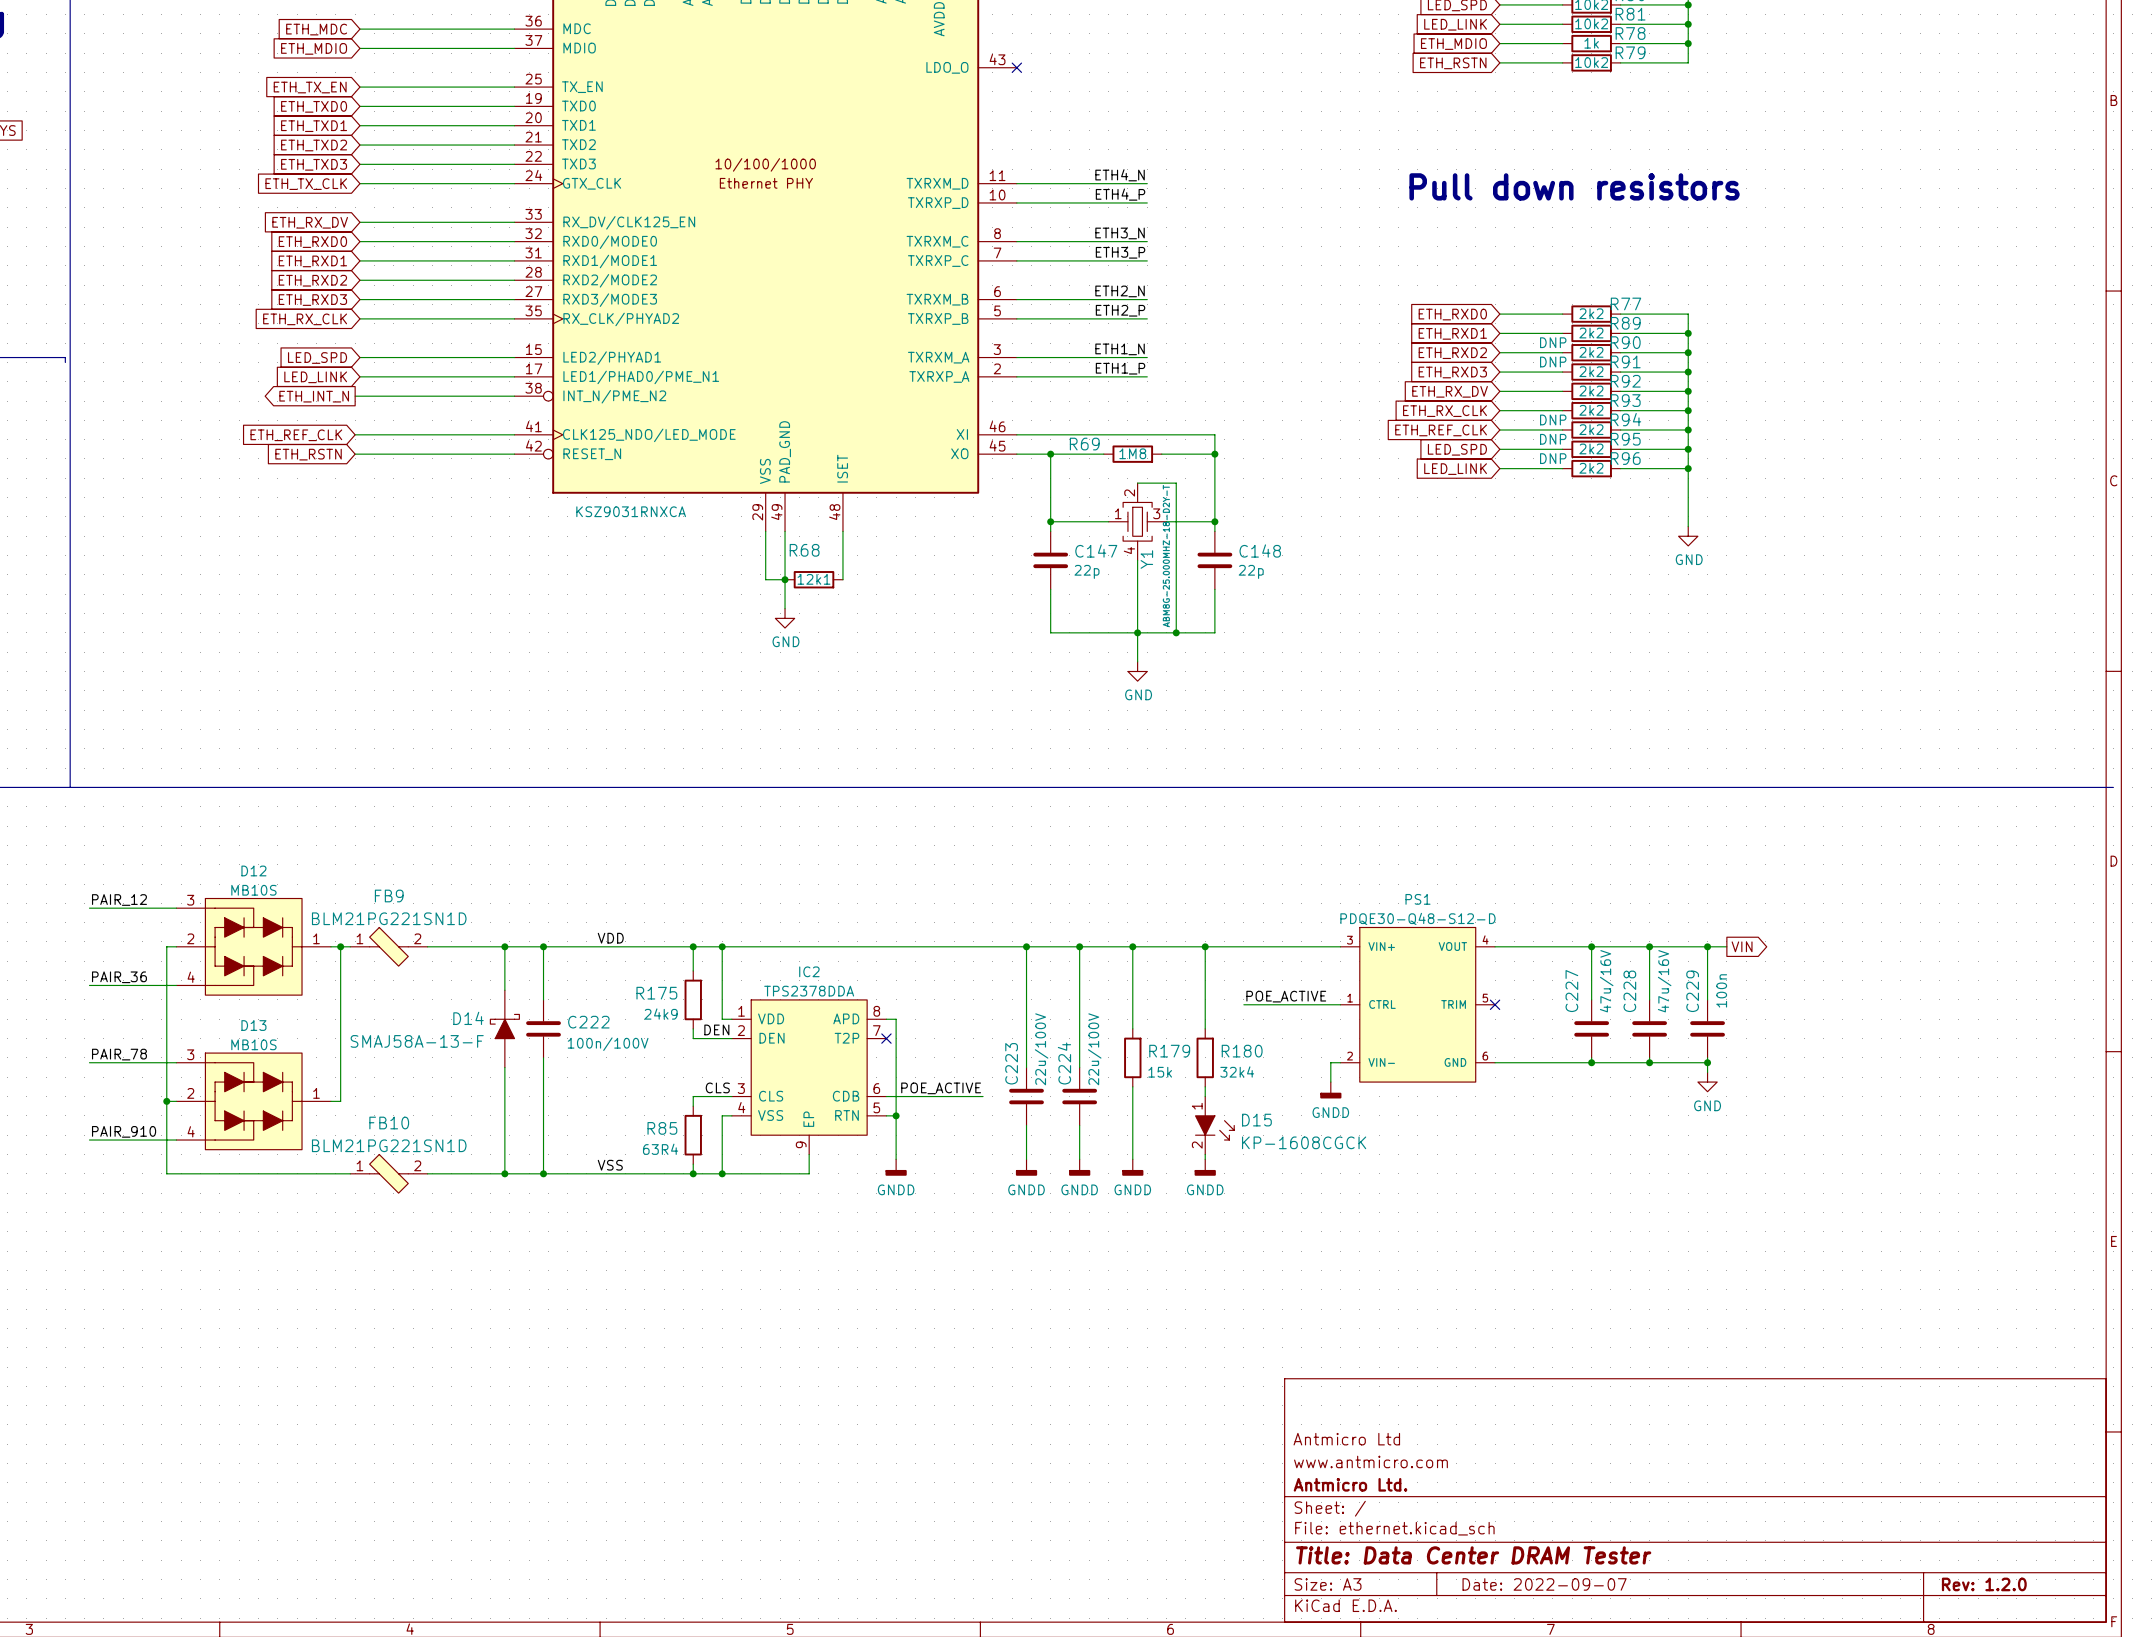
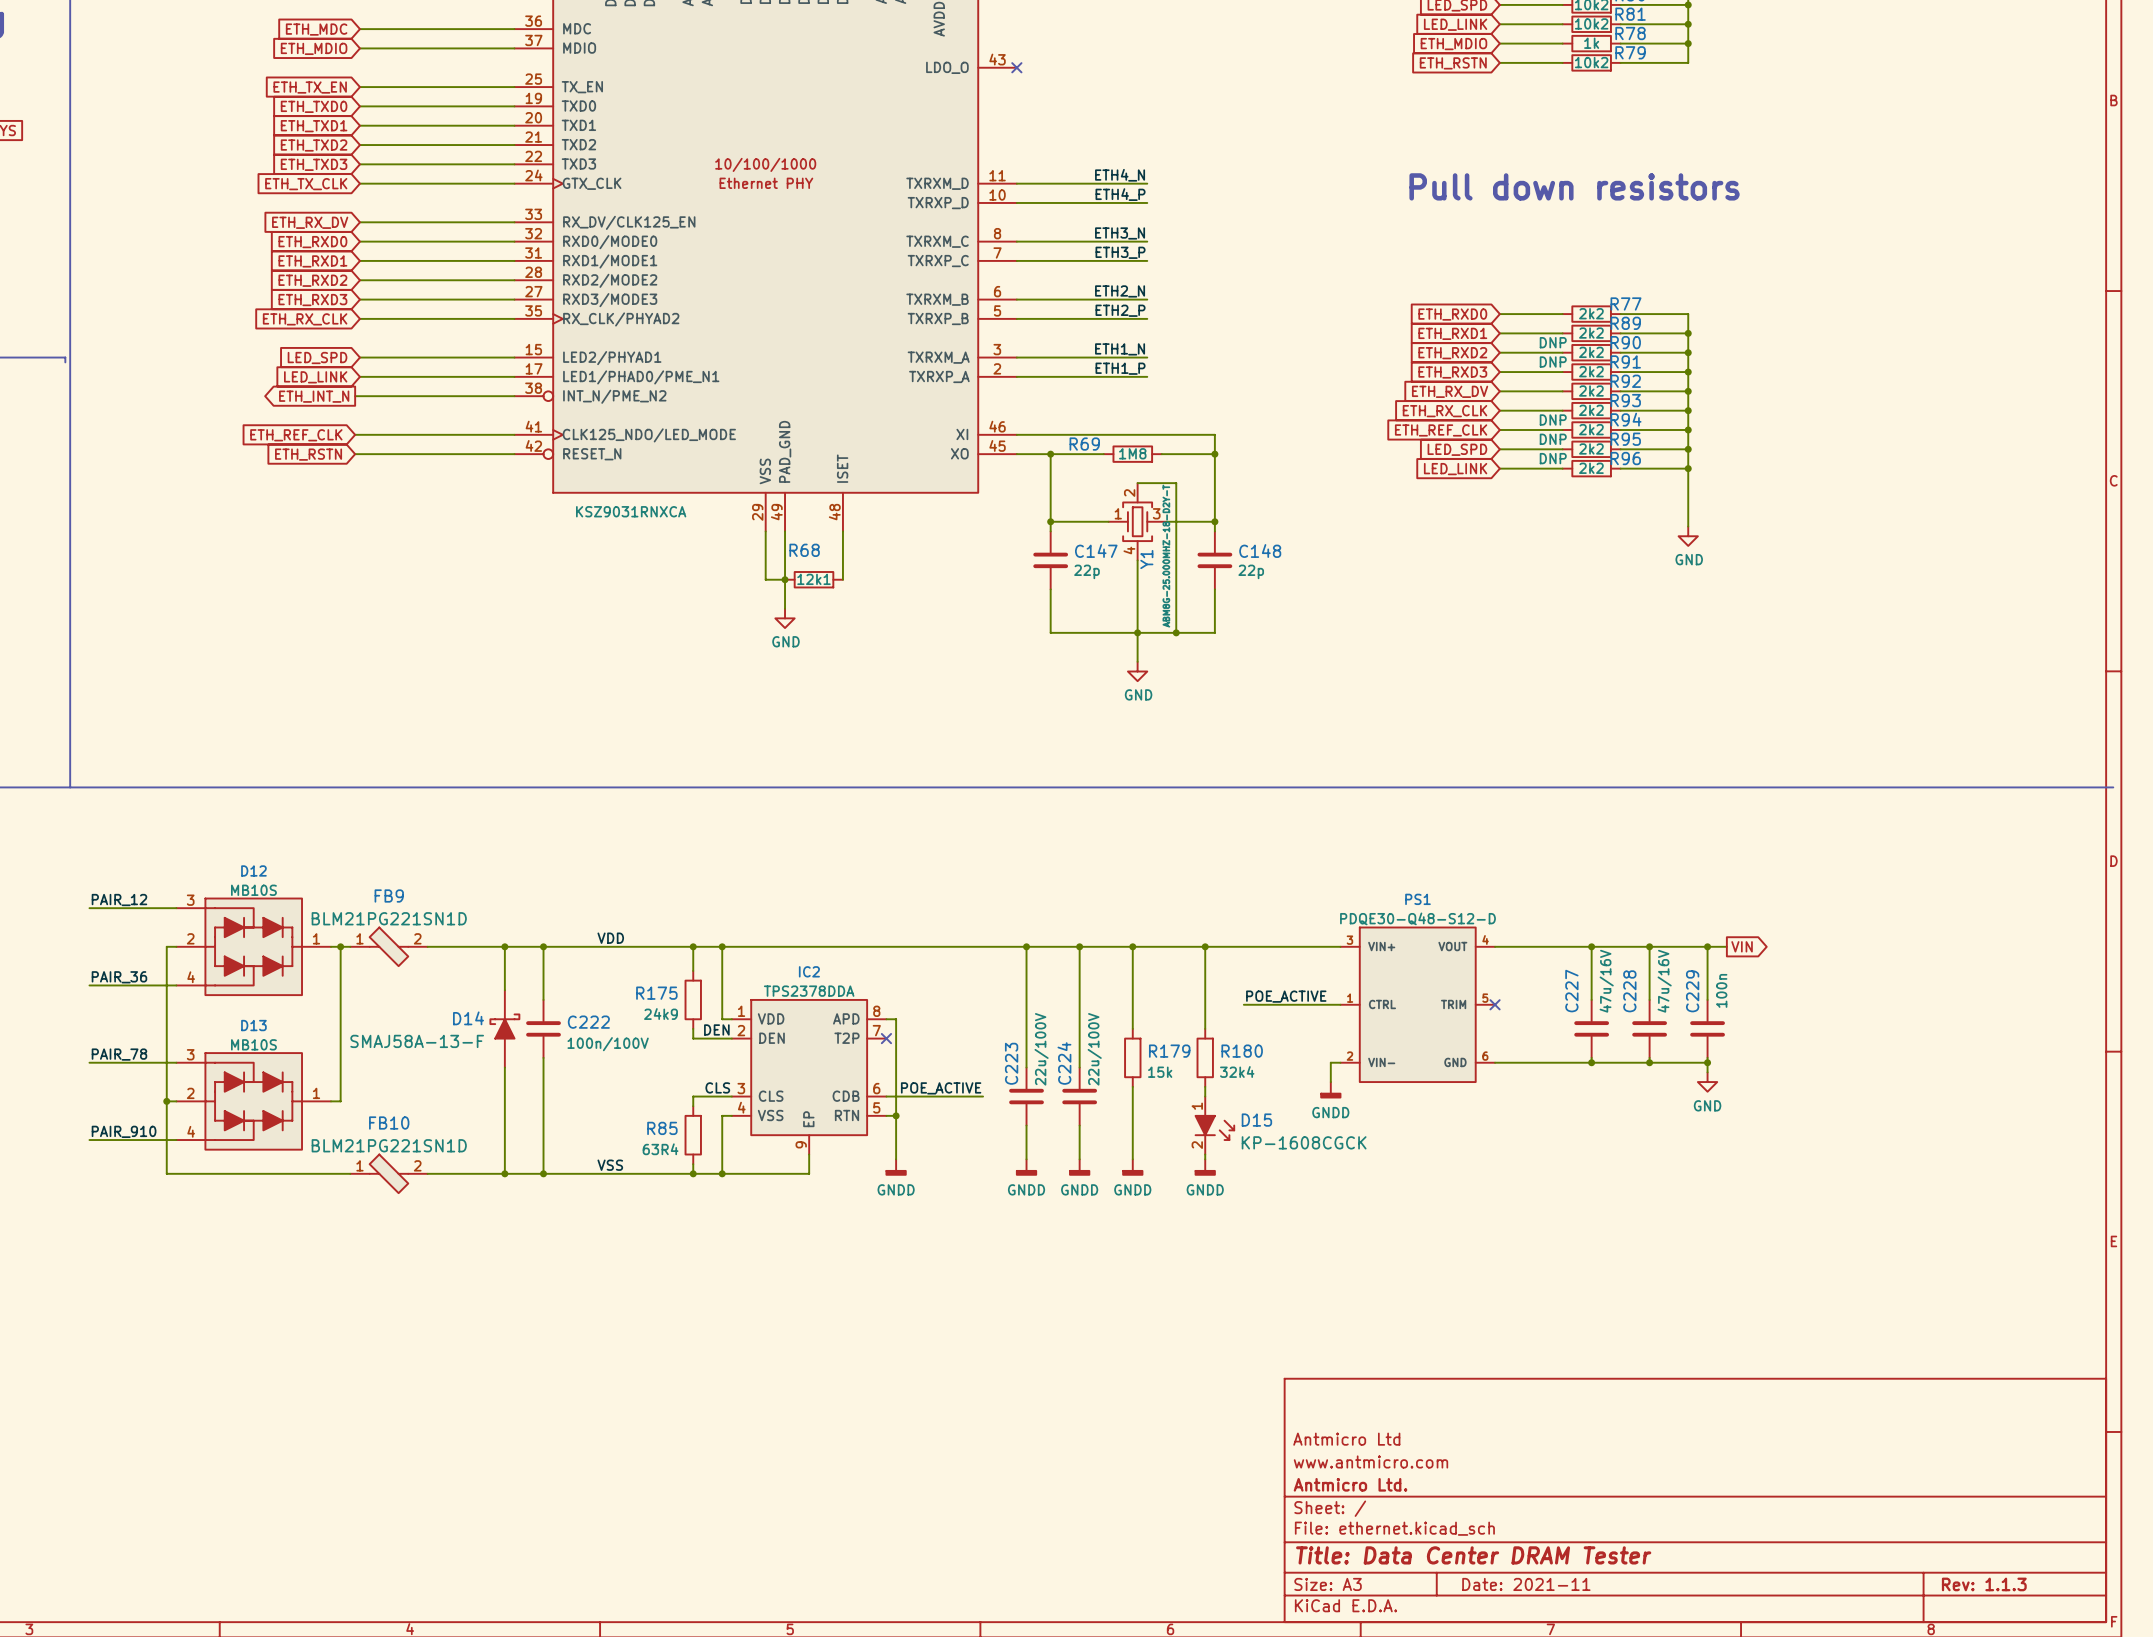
title block: Date: 2022-09-07 (1544, 1584) -> Date: 2021-11 (1526, 1584)
title block: Rev: 1.2.0 (1984, 1584) -> Rev: 1.1.3 (1984, 1584)

